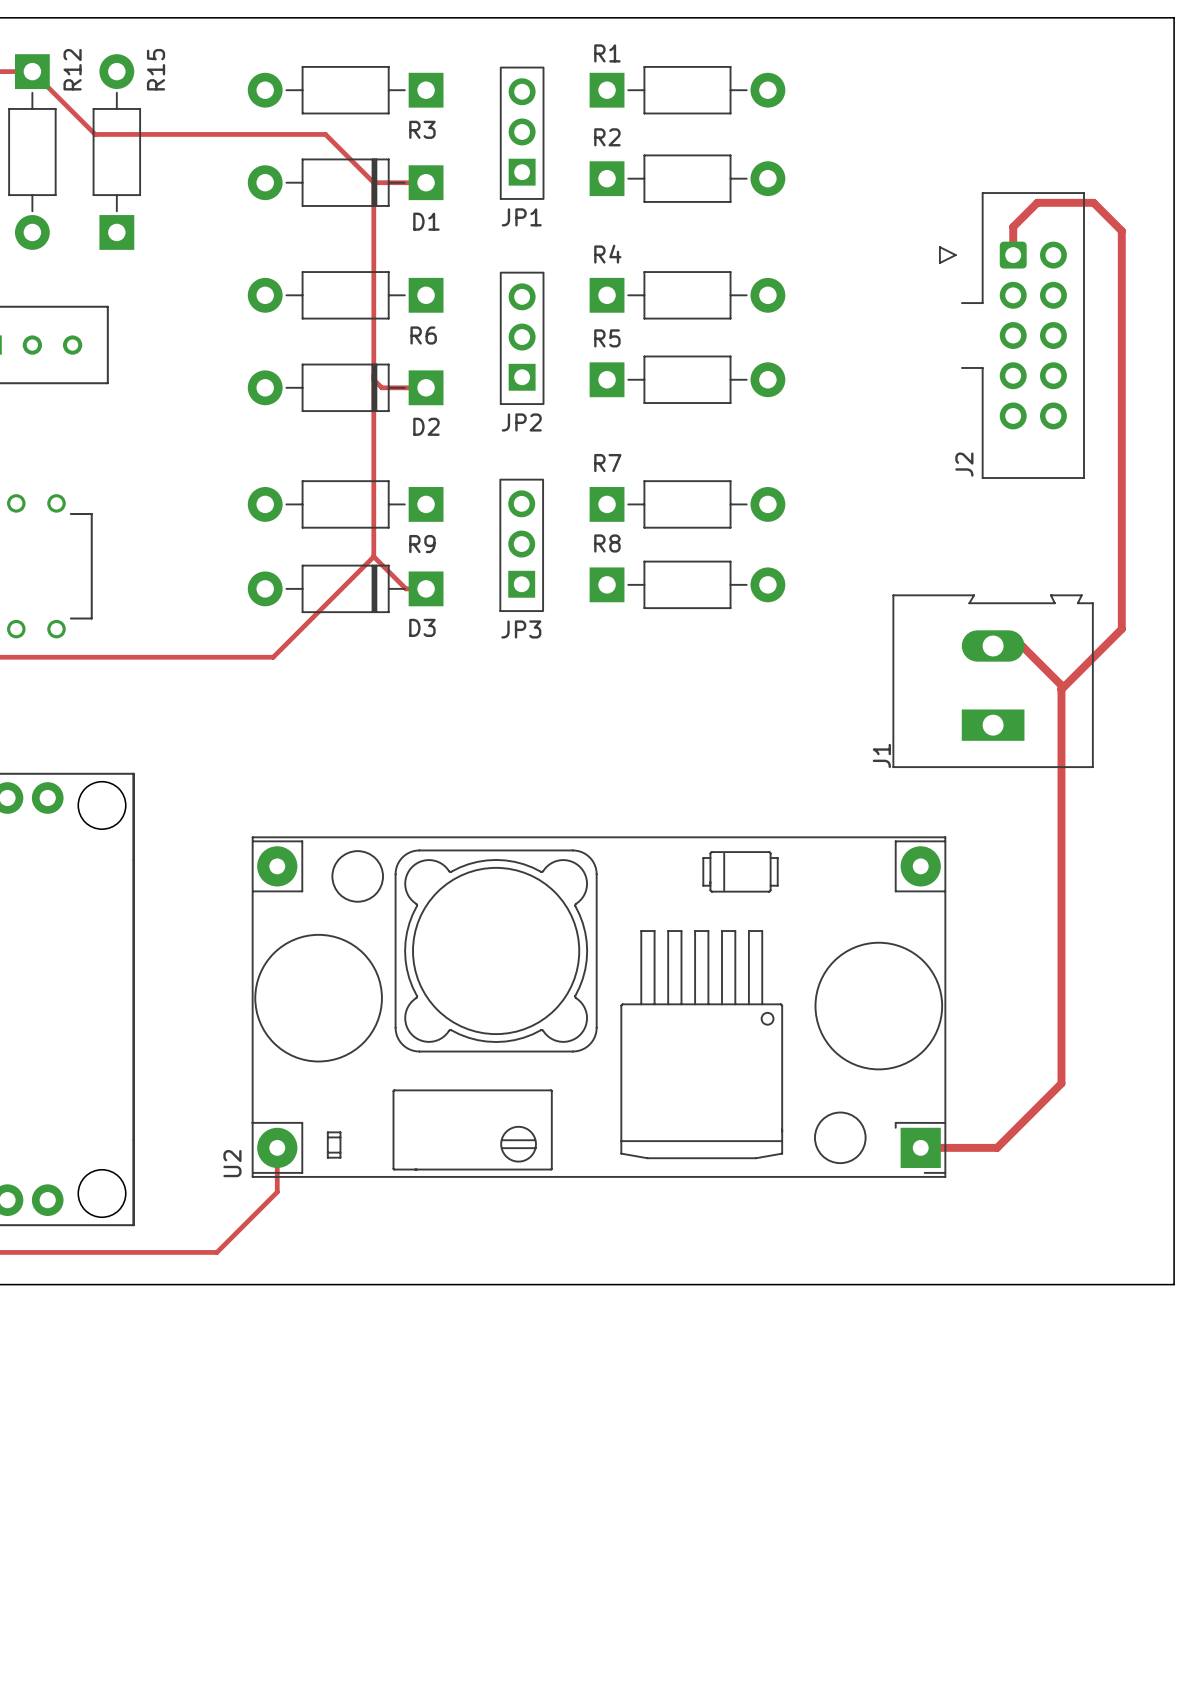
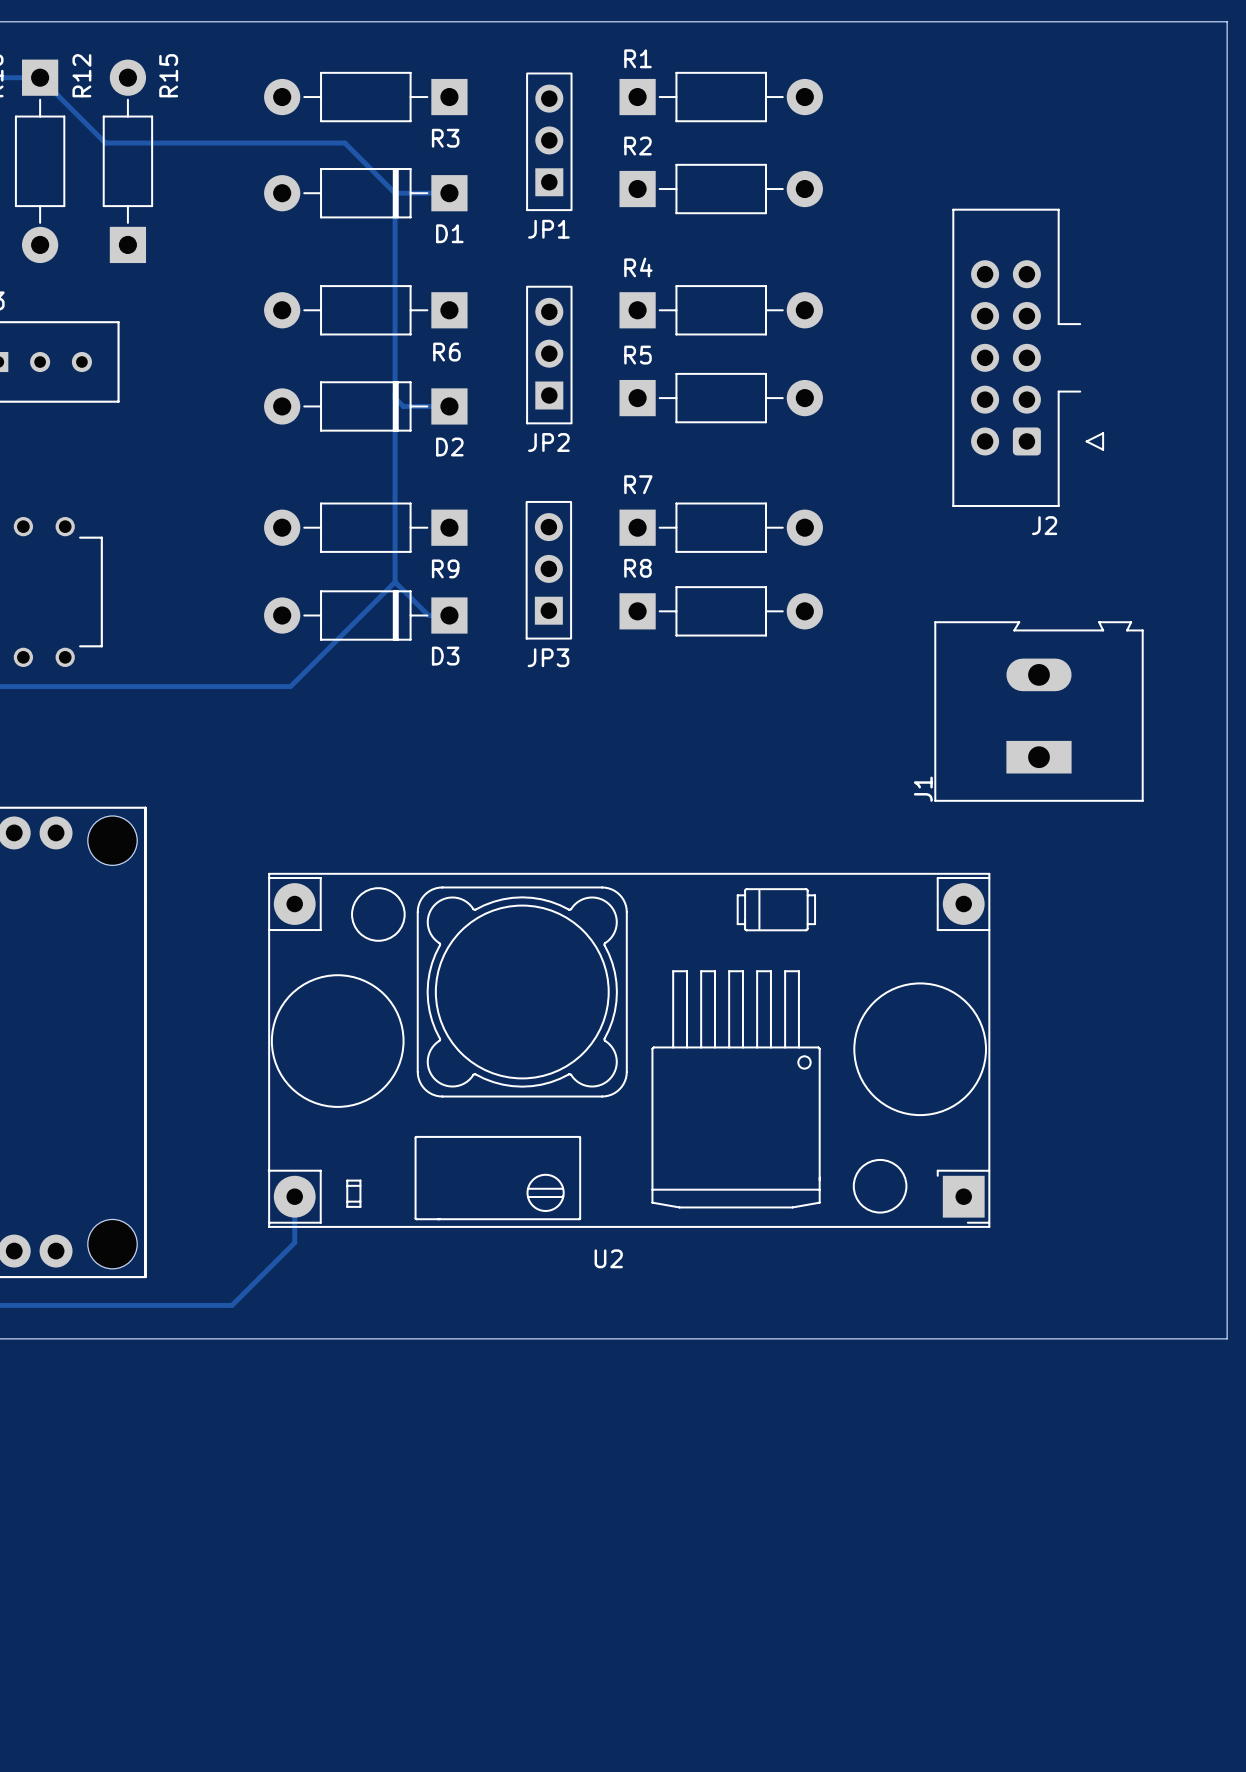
track: (1013, 255) (1013, 226) (1037, 202) (1093, 202) (1121, 230) (1121, 629) (1061, 689) -> none
J2 rotation: 0° (1011, 335) -> 180° (1028, 357)
J2 name position: J2 (964, 464) -> J2 (1044, 525)
track: (993, 645) (1022, 645) (1061, 685) (1061, 1083) (997, 1147) (920, 1147) -> none
U2 name rotation: 0° (232, 1163) -> 90° clockwise (608, 1258)
U2 name position: U2 (232, 1163) -> U2 (608, 1258)

